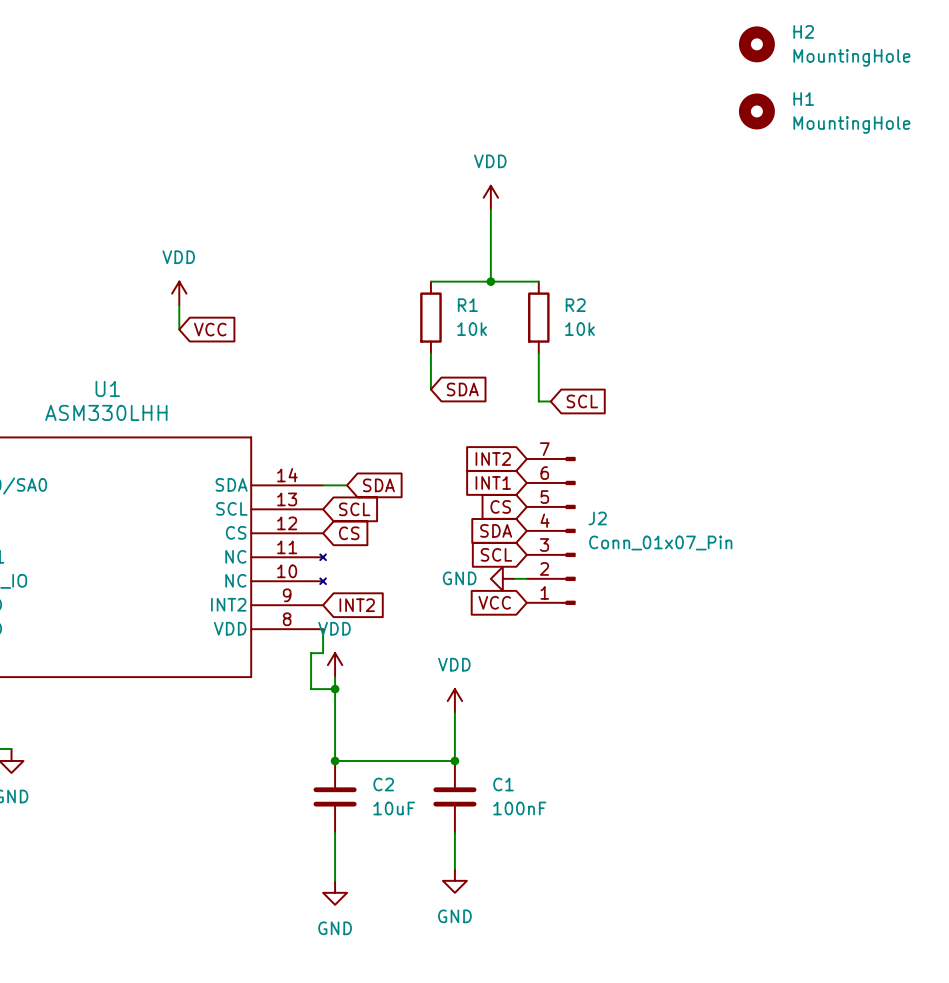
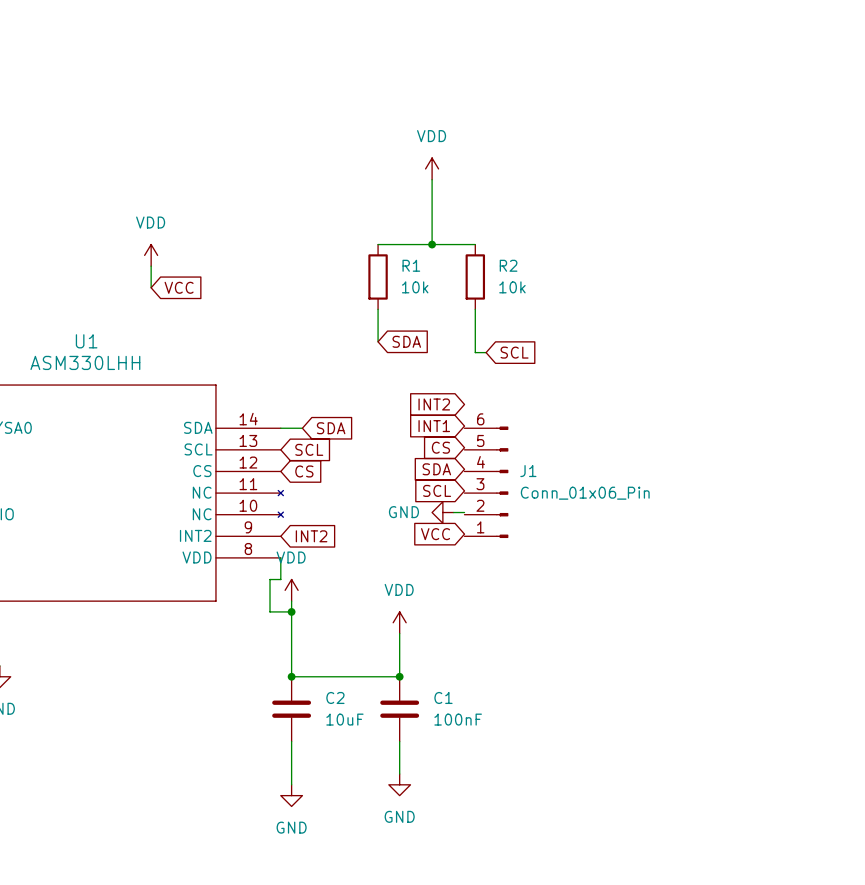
H2: MountingHole (756, 44) -> none
H1: MountingHole (756, 111) -> none
J2: Conn_01x07_Pin (551, 530) -> none
J1: none -> Conn_01x06_Pin (486, 482)

